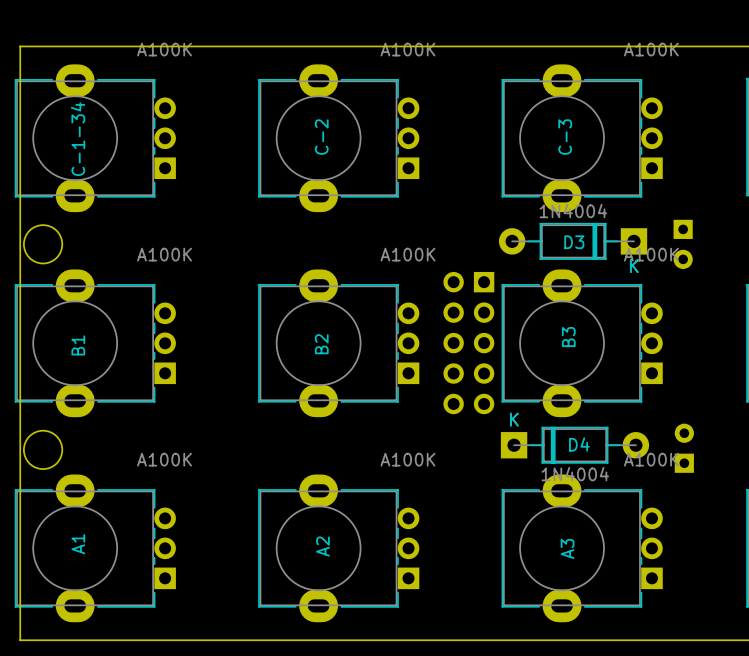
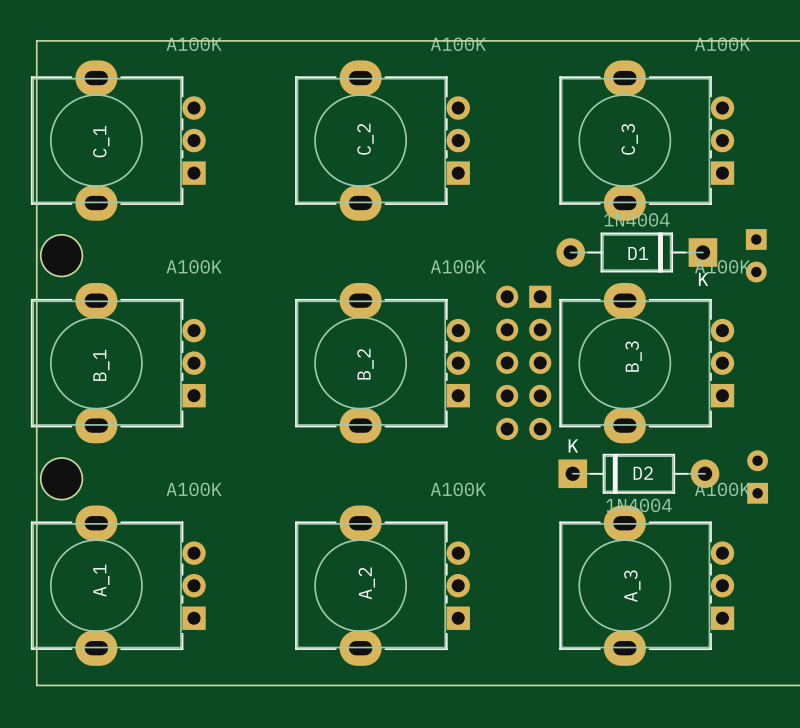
C-2 name: C-2 (321, 137) -> C_2 (365, 139)
C-3 name: C-3 (565, 137) -> C_3 (629, 139)
C-1-34 name: C-1-34 (78, 139) -> C_1 (101, 141)
D3 name: D3 (574, 242) -> D1 (638, 253)
B3 name: B3 (568, 337) -> B_3 (633, 356)
B2 name: B2 (321, 344) -> B_2 (365, 364)
B1 name: B1 (78, 345) -> B_1 (101, 365)
D4 name: D4 (579, 444) -> D2 (643, 473)
A1 name: A1 (78, 544) -> A_1 (101, 580)
A2 name: A2 (322, 546) -> A_2 (366, 583)
A3 name: A3 (567, 548) -> A_3 (632, 586)

